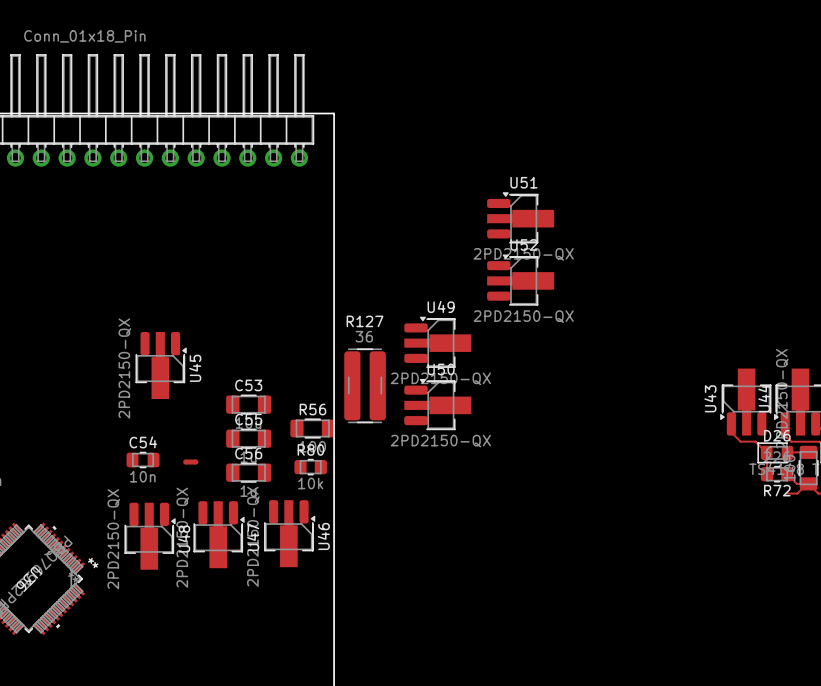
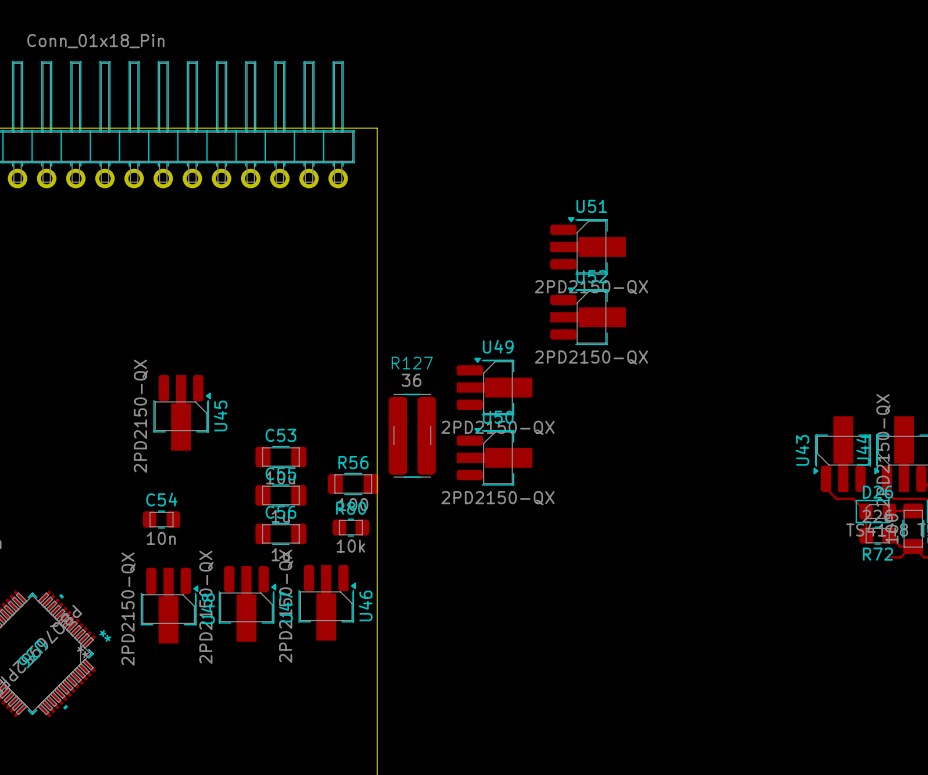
part: (190, 462) -> none

